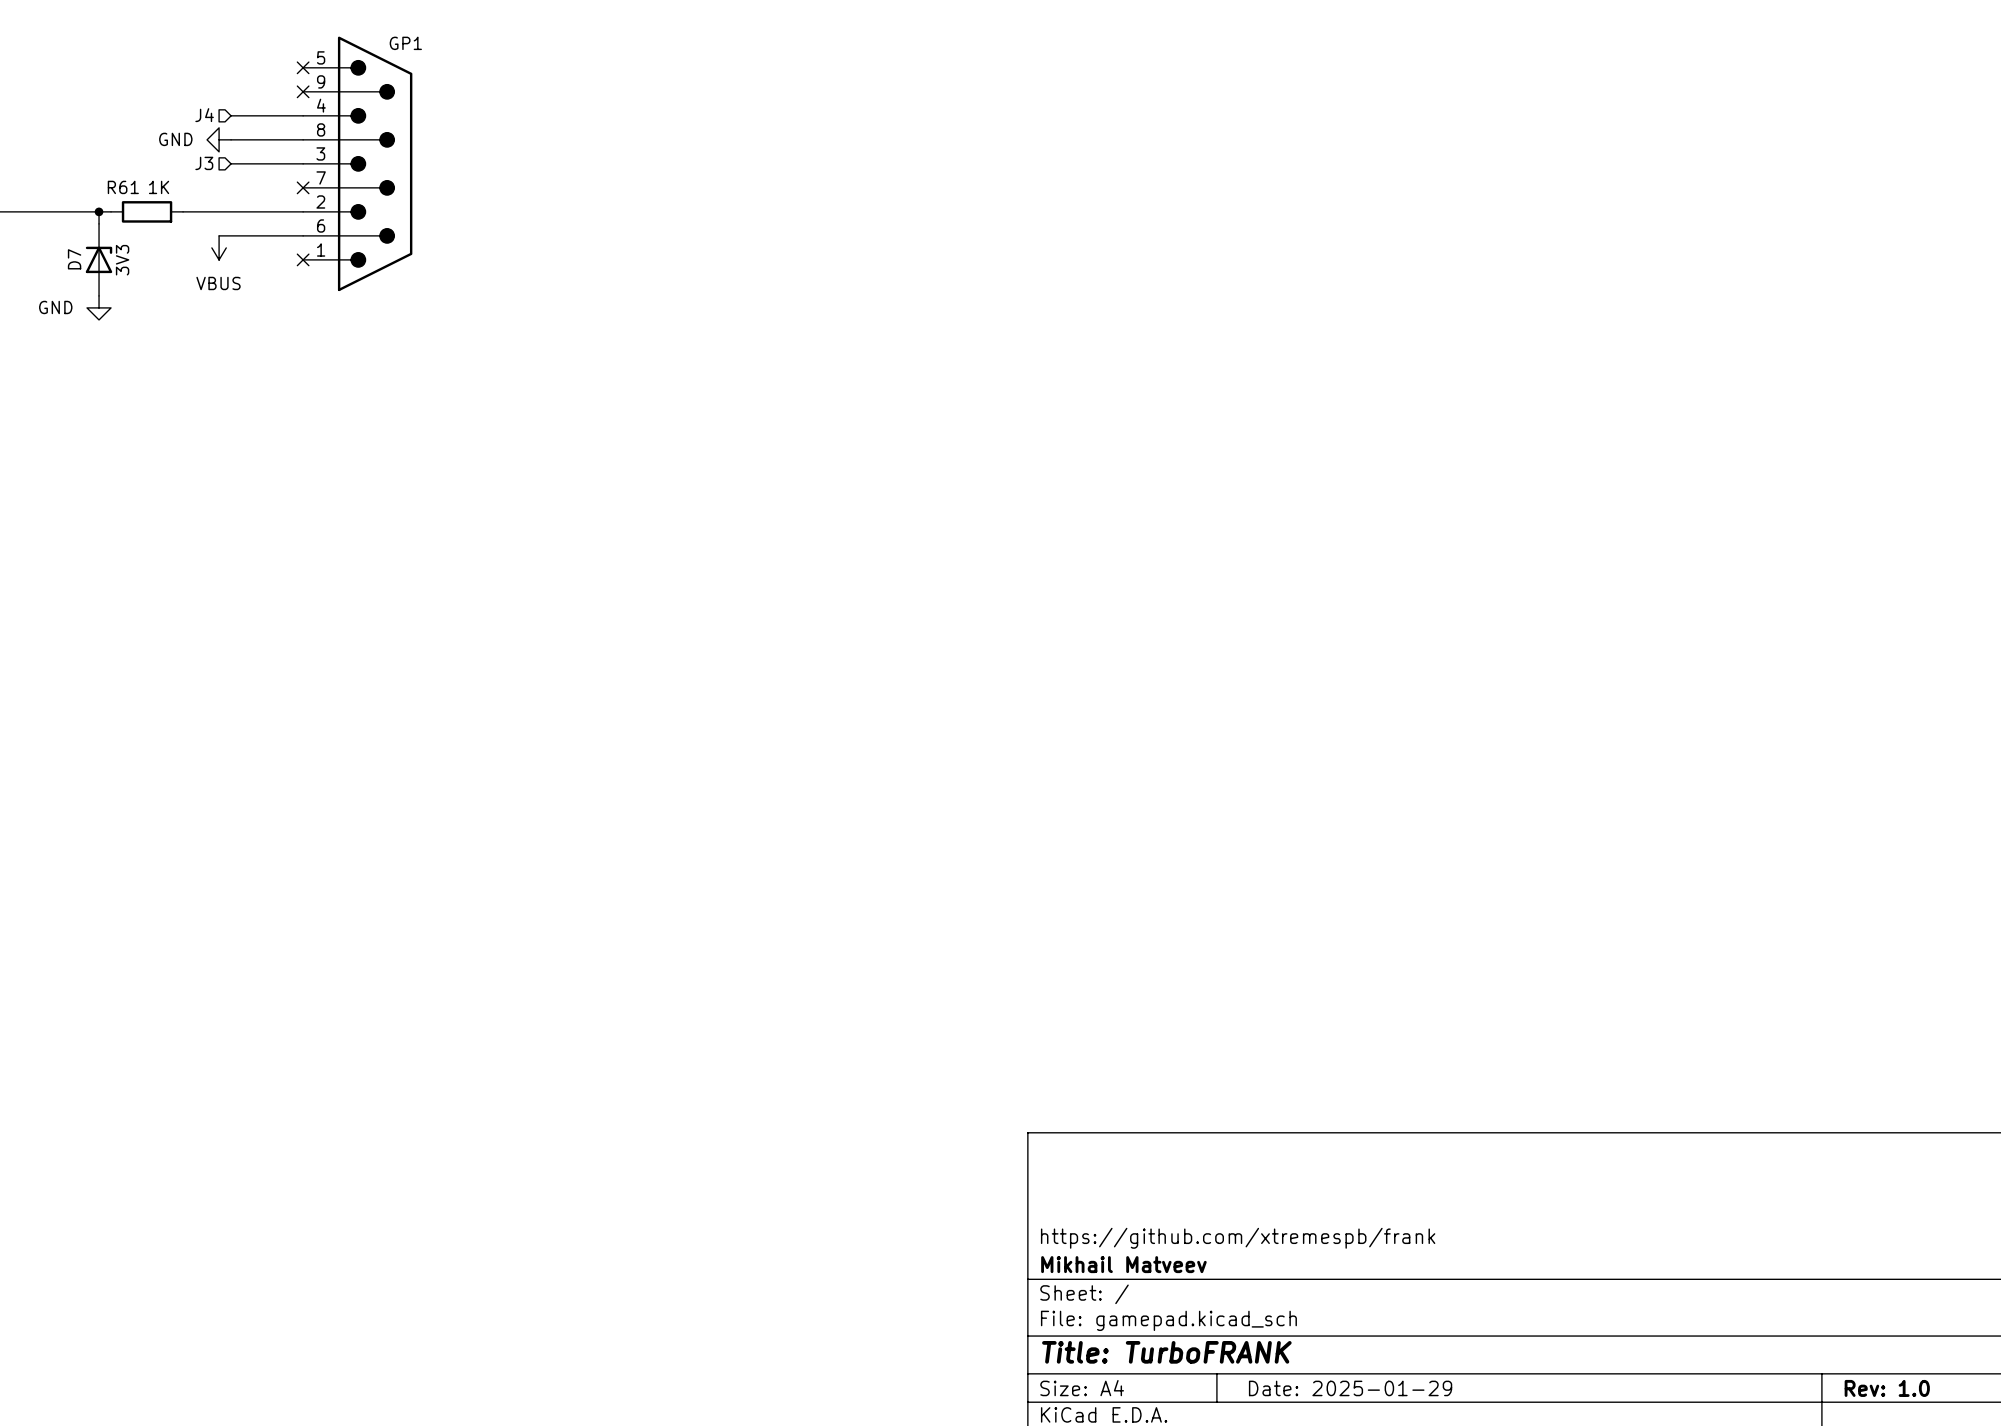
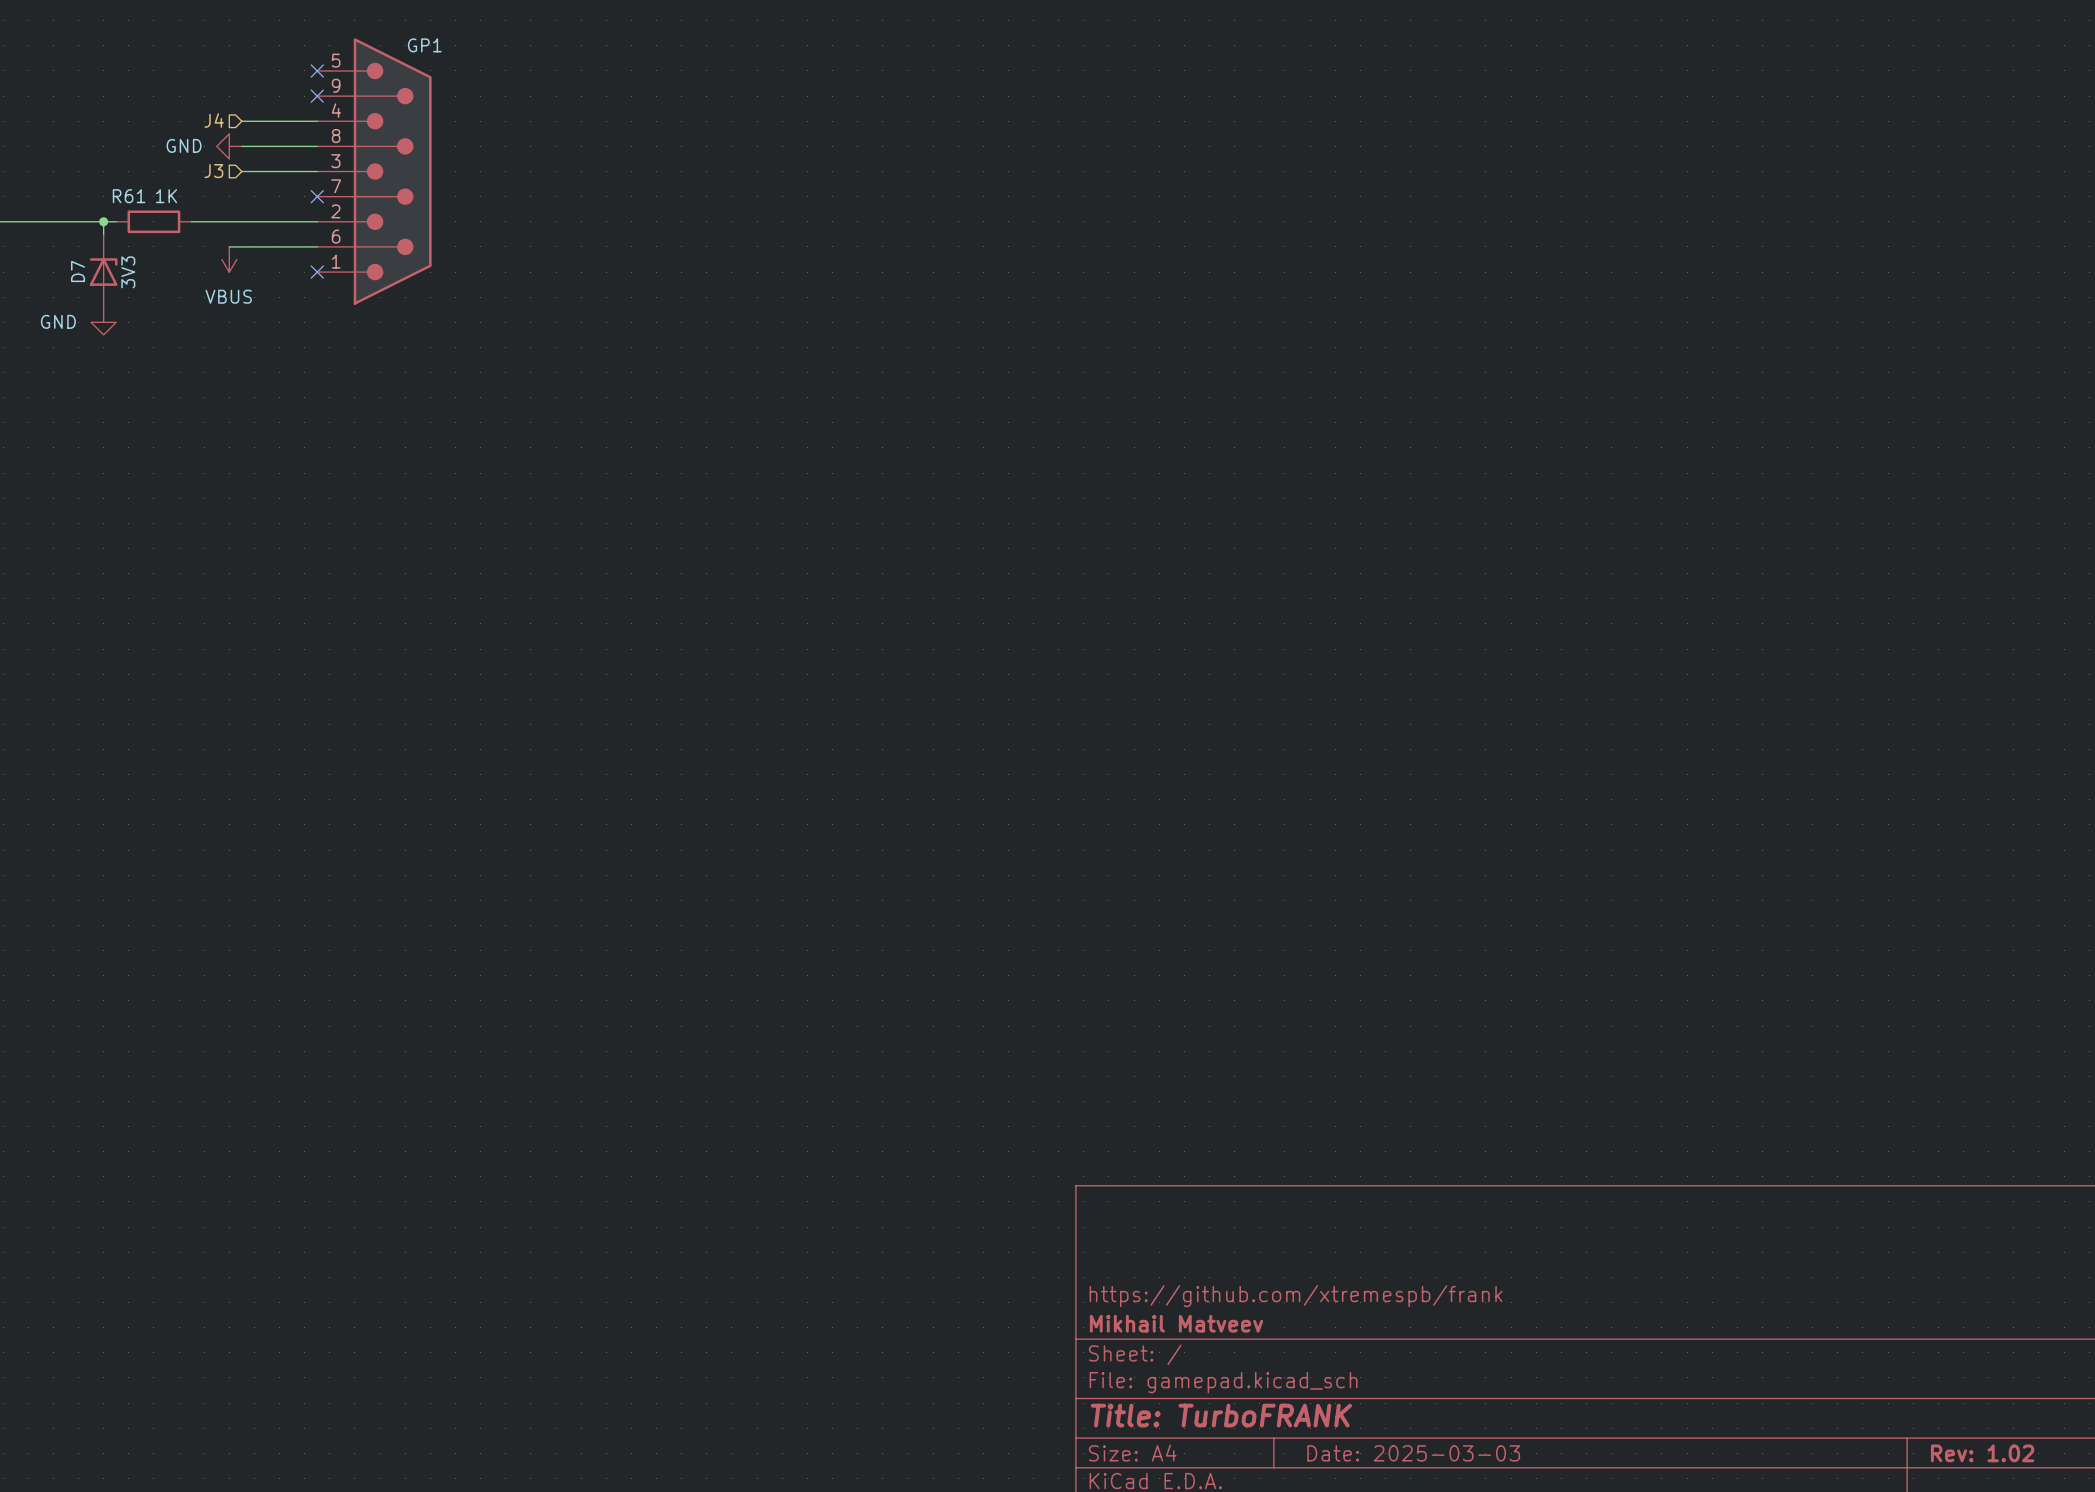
title block: Date: 2025-01-29 (1350, 1388) -> Date: 2025-03-03 (1413, 1453)
title block: Rev: 1.0 (1887, 1388) -> Rev: 1.02 (1982, 1453)

